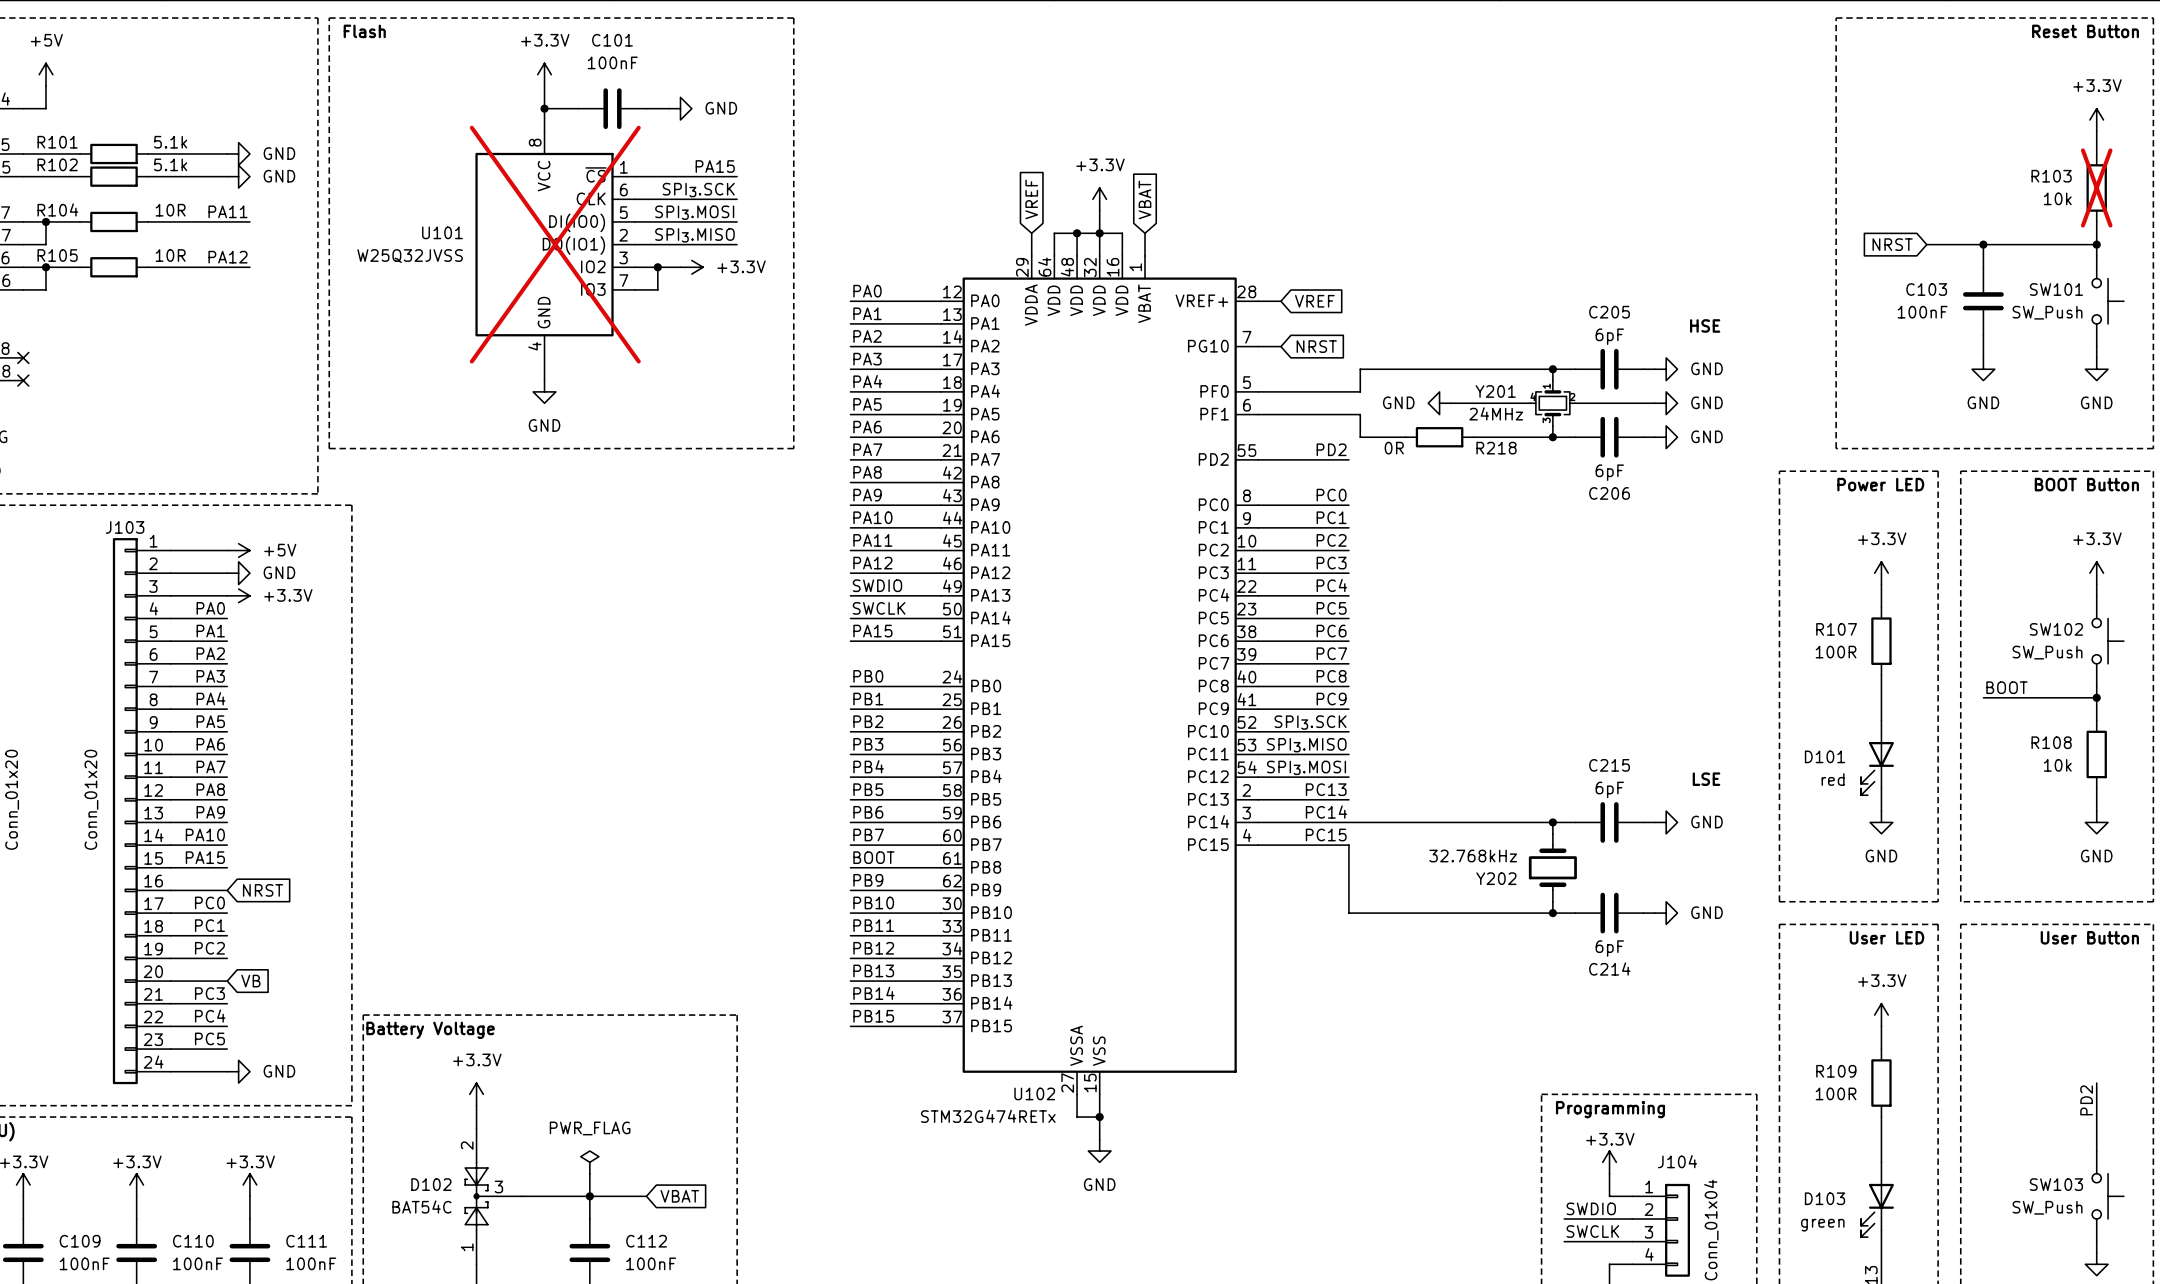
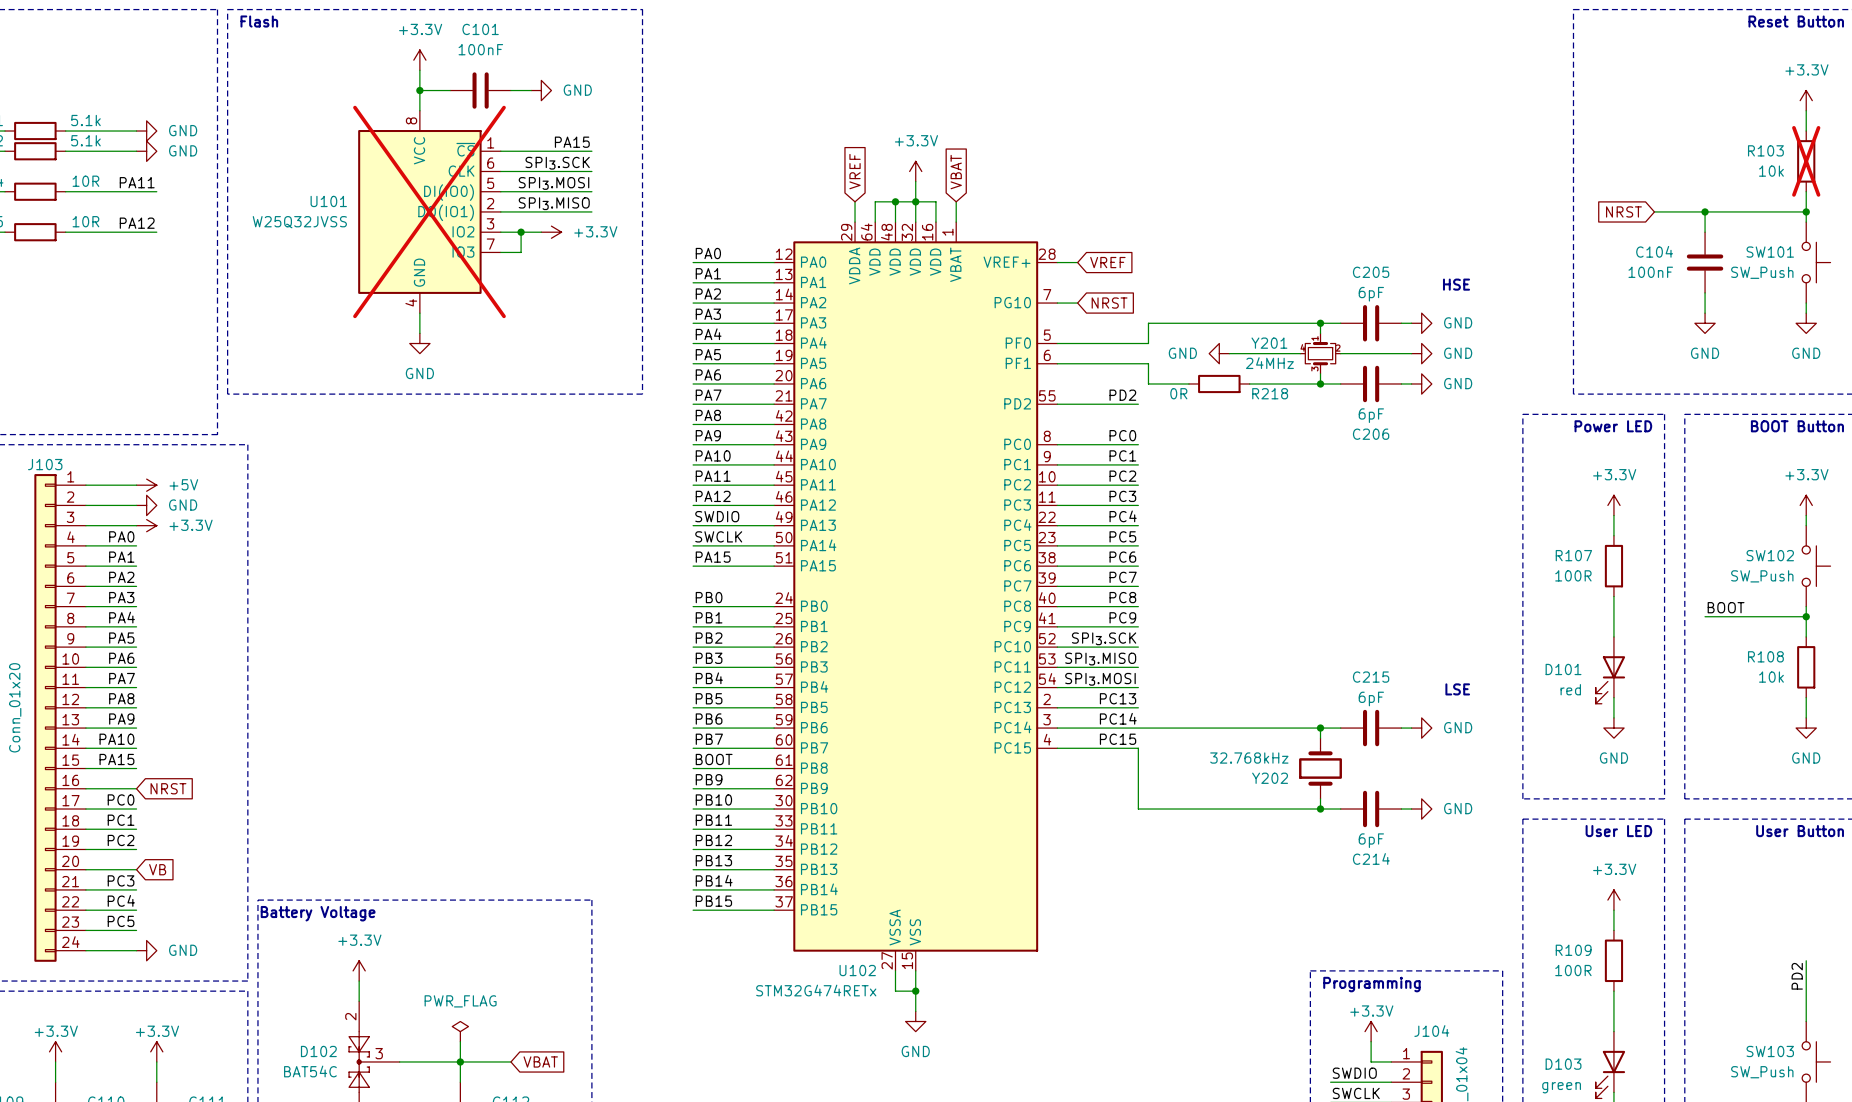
C103 name: C103 (1926, 289) -> C104 (1654, 251)

